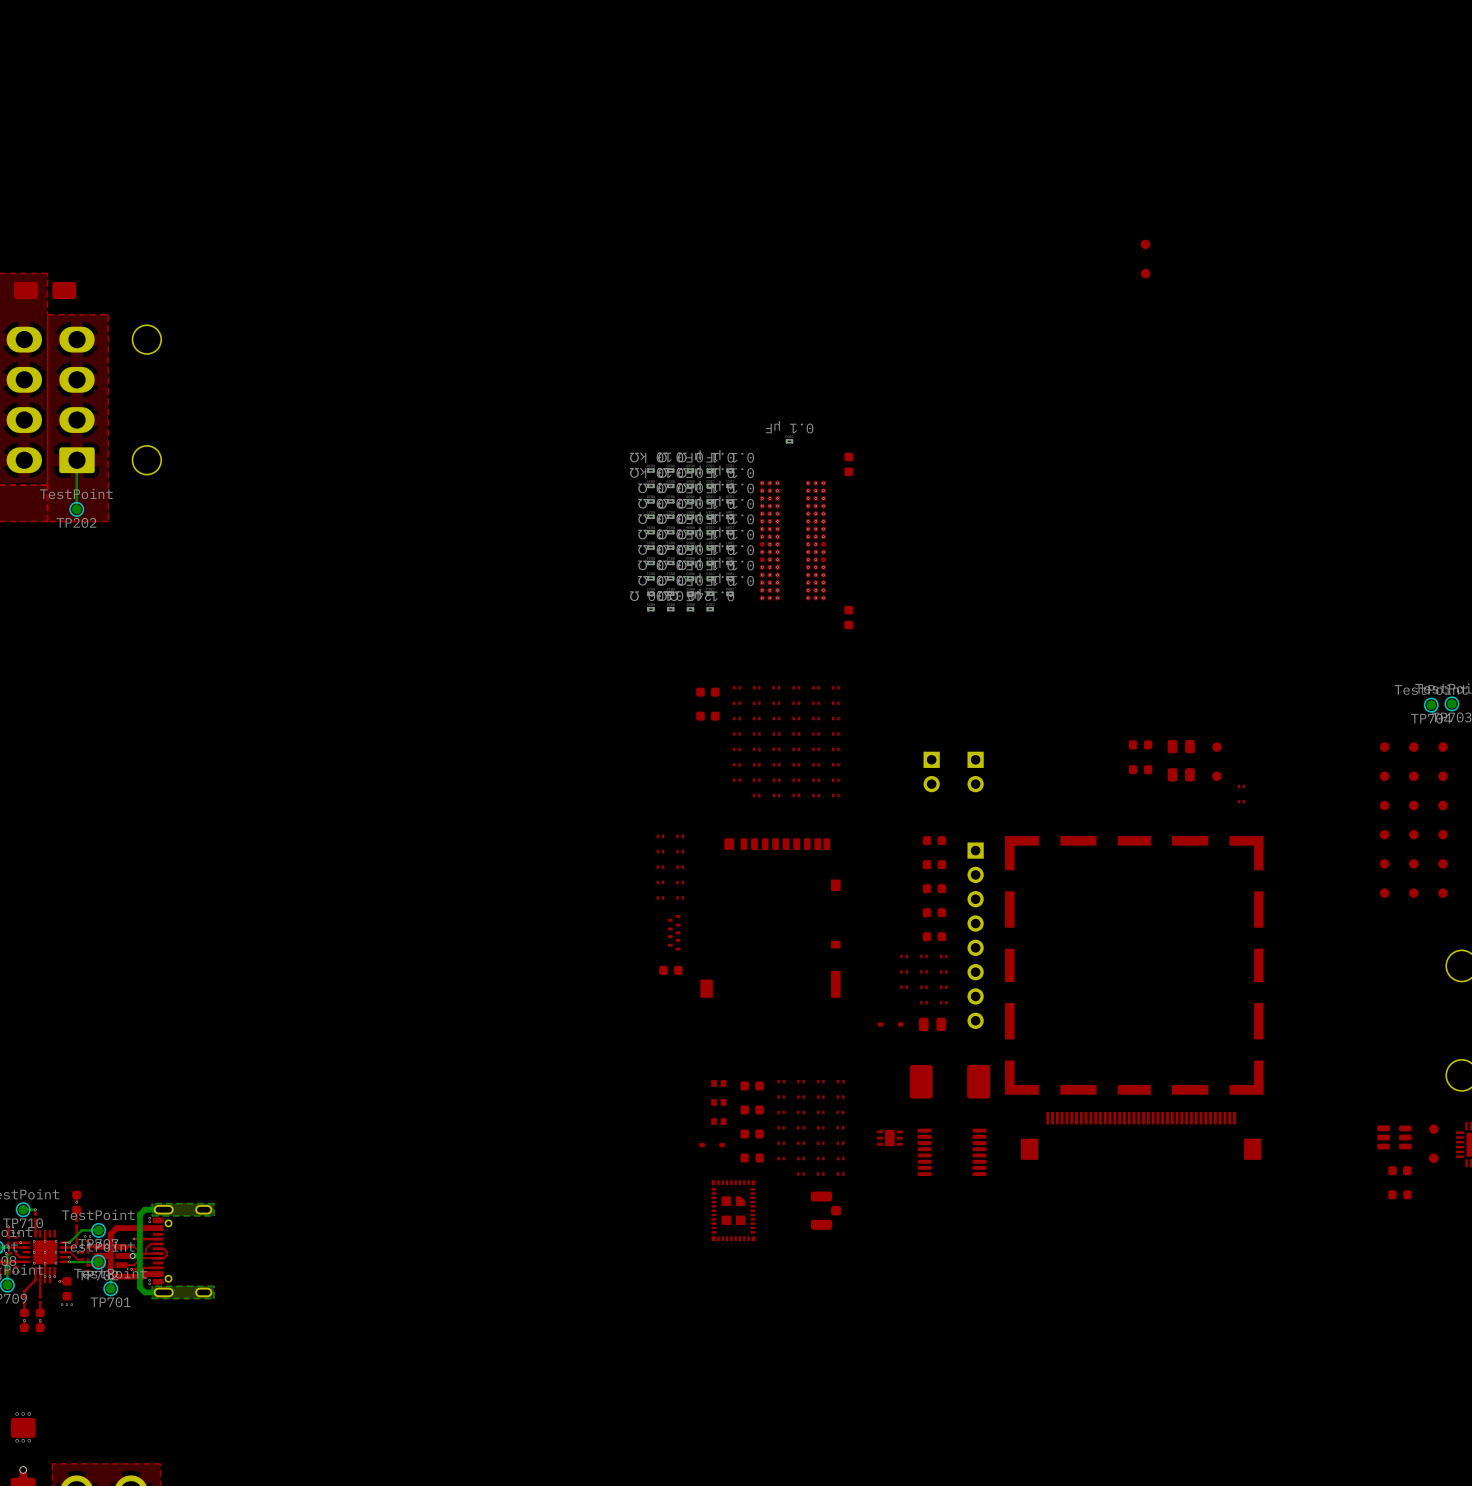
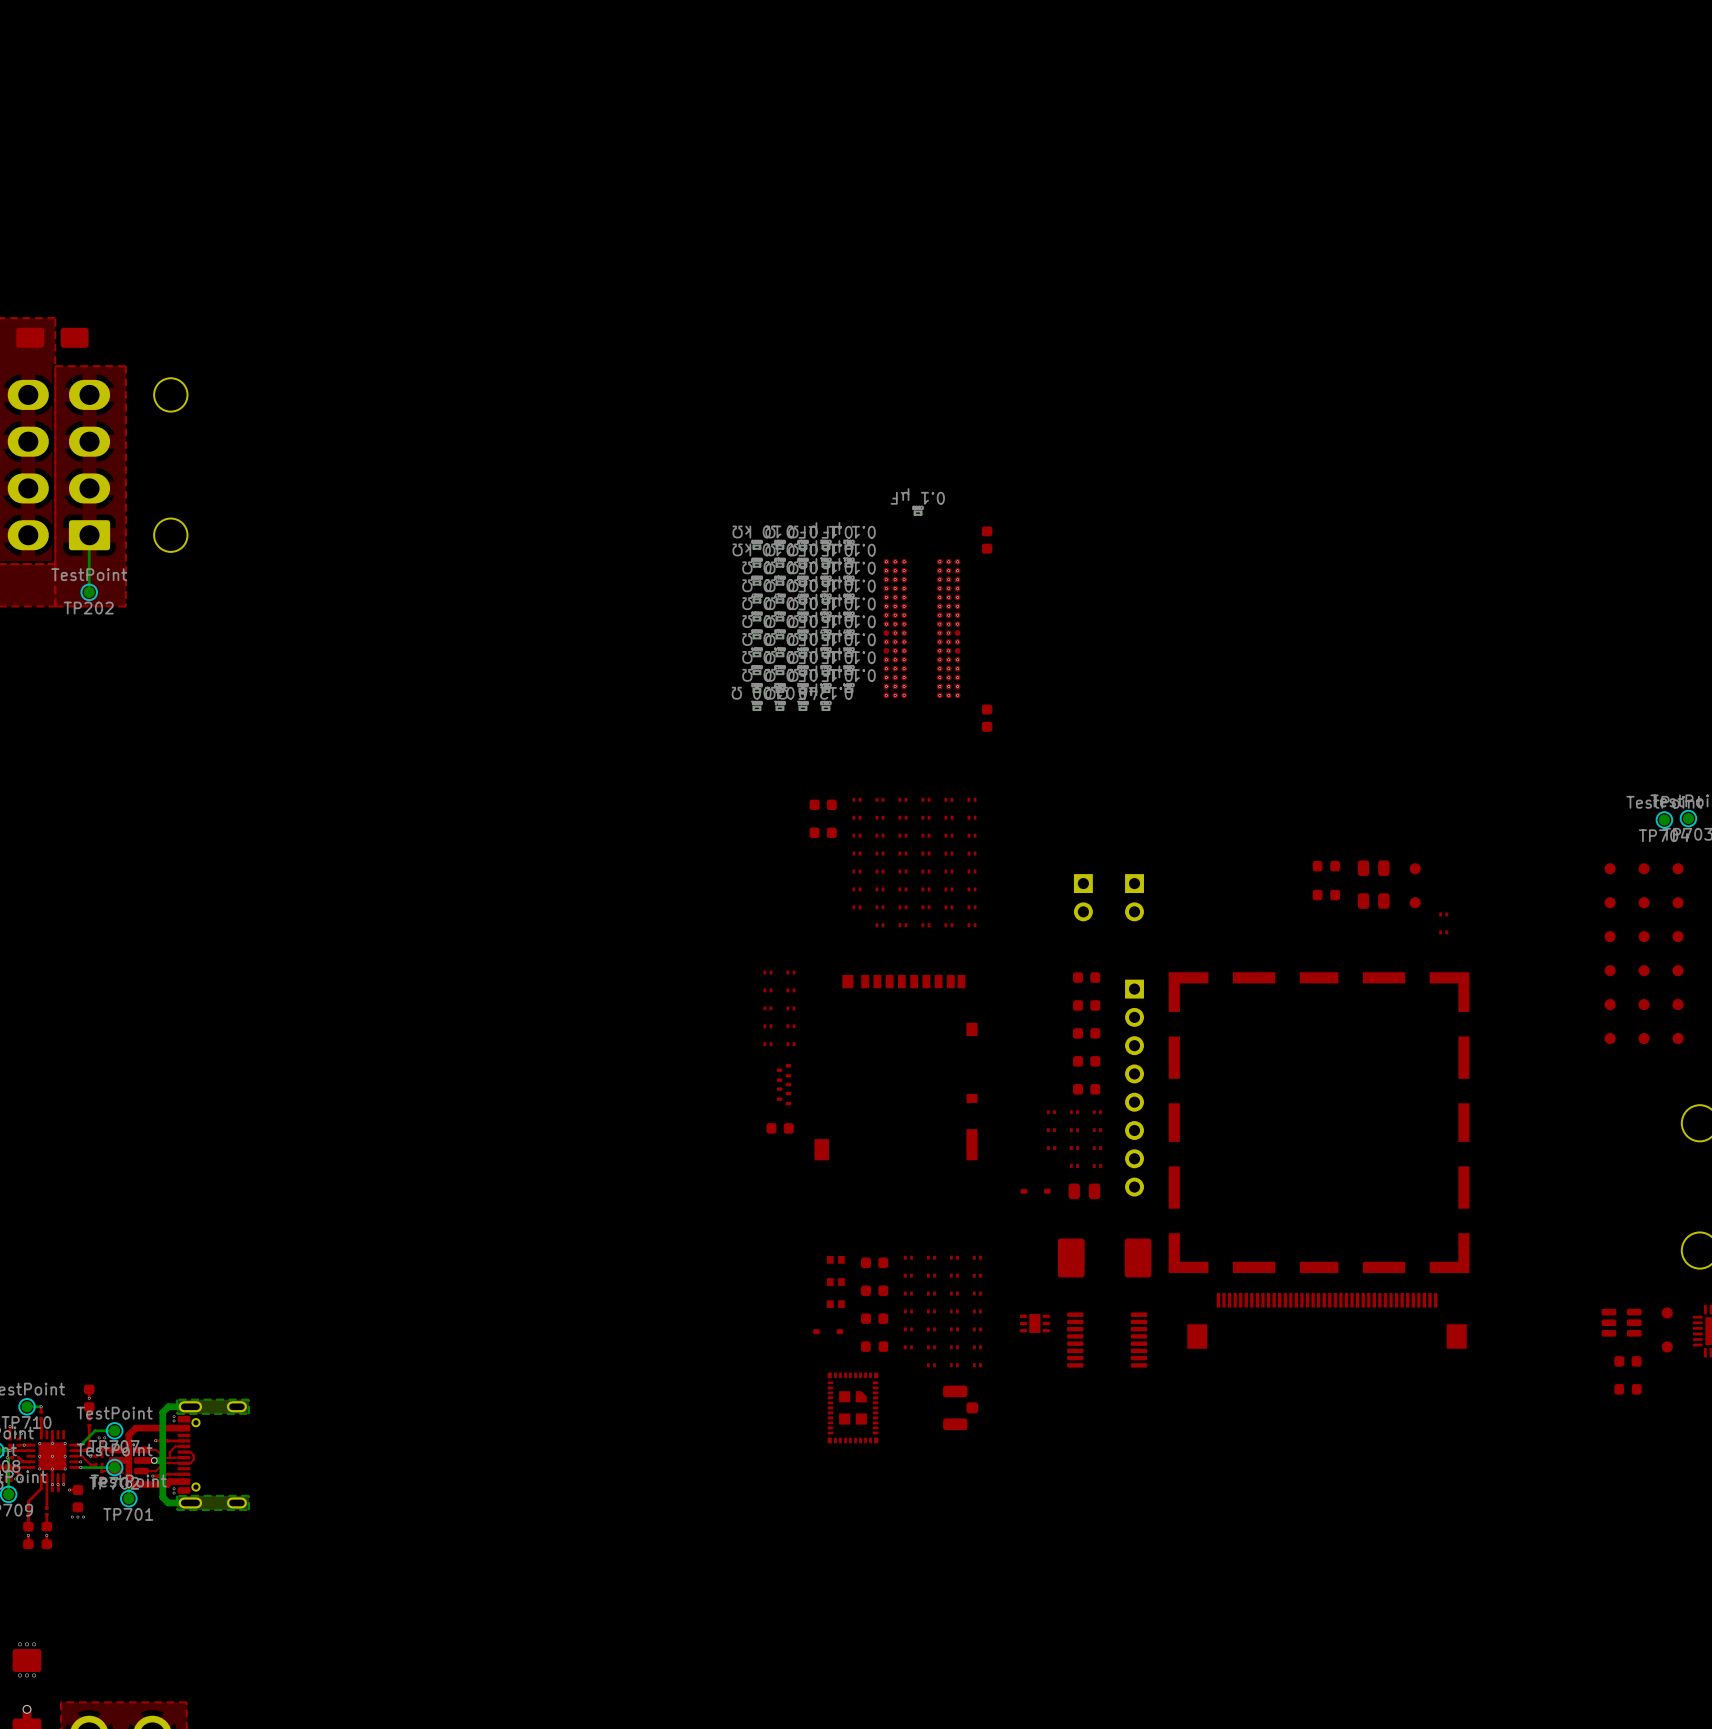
part: (1145, 244) -> none
part: (1145, 273) -> none

